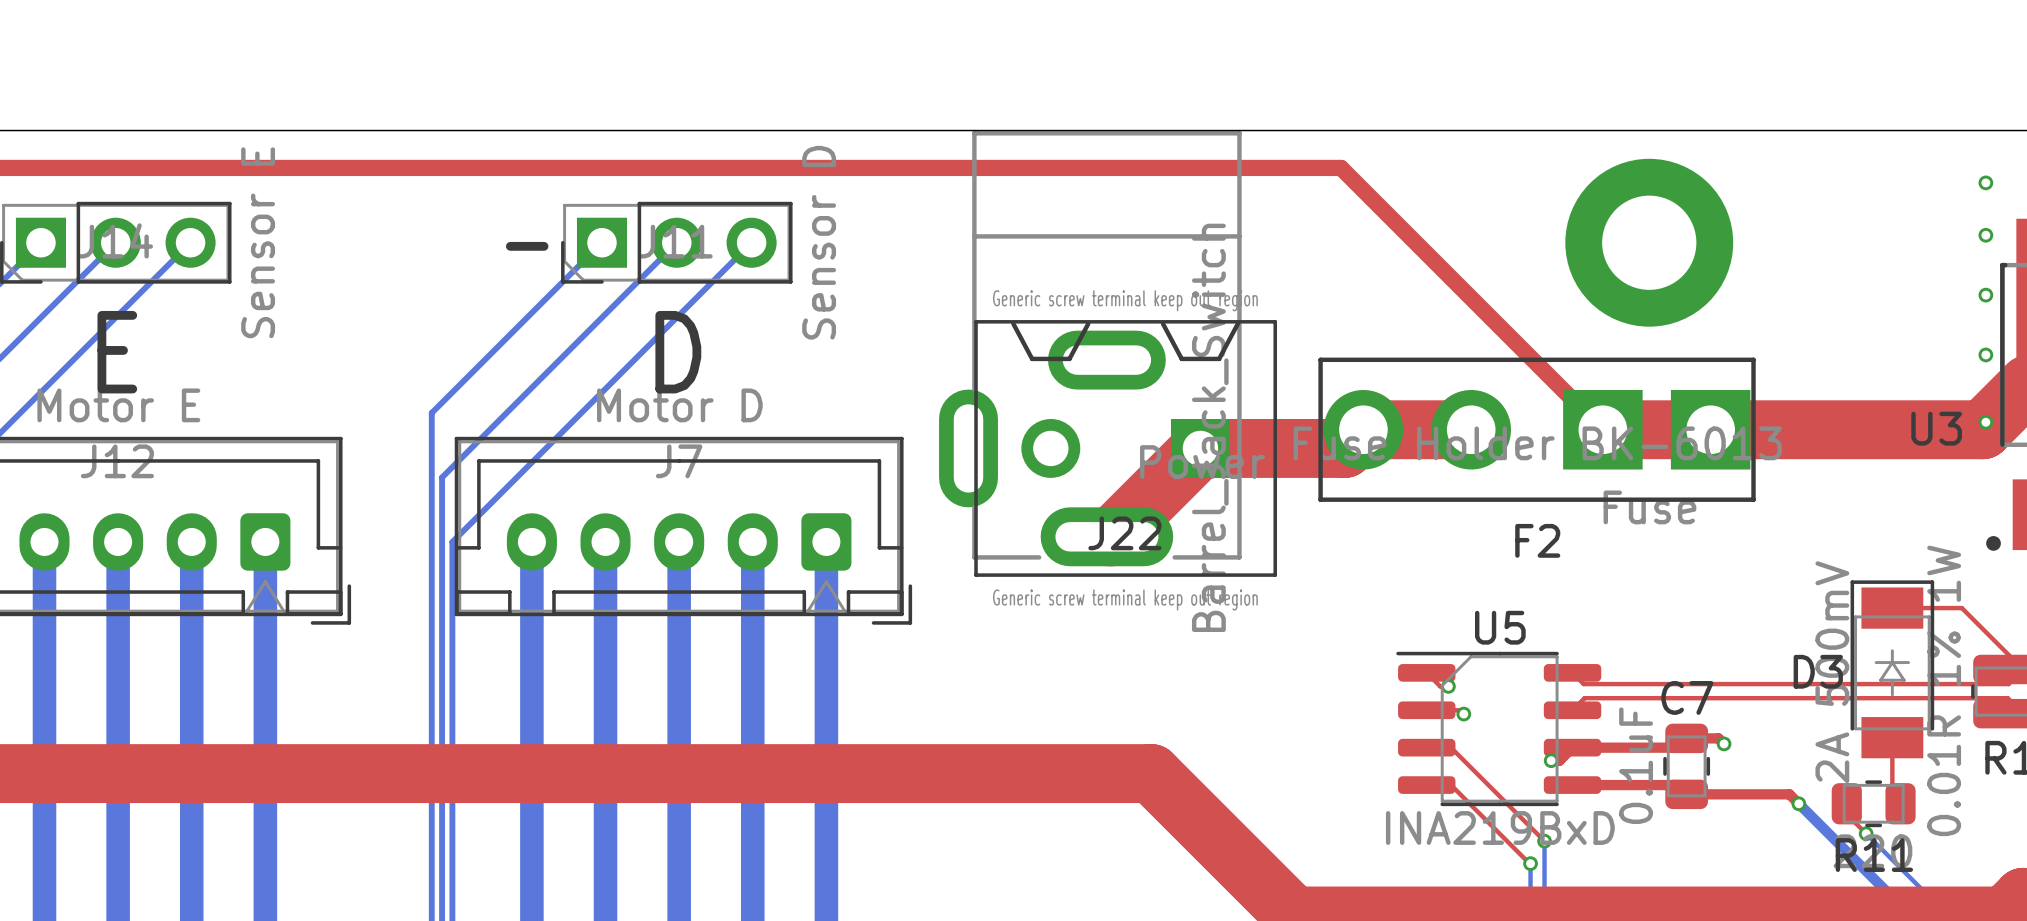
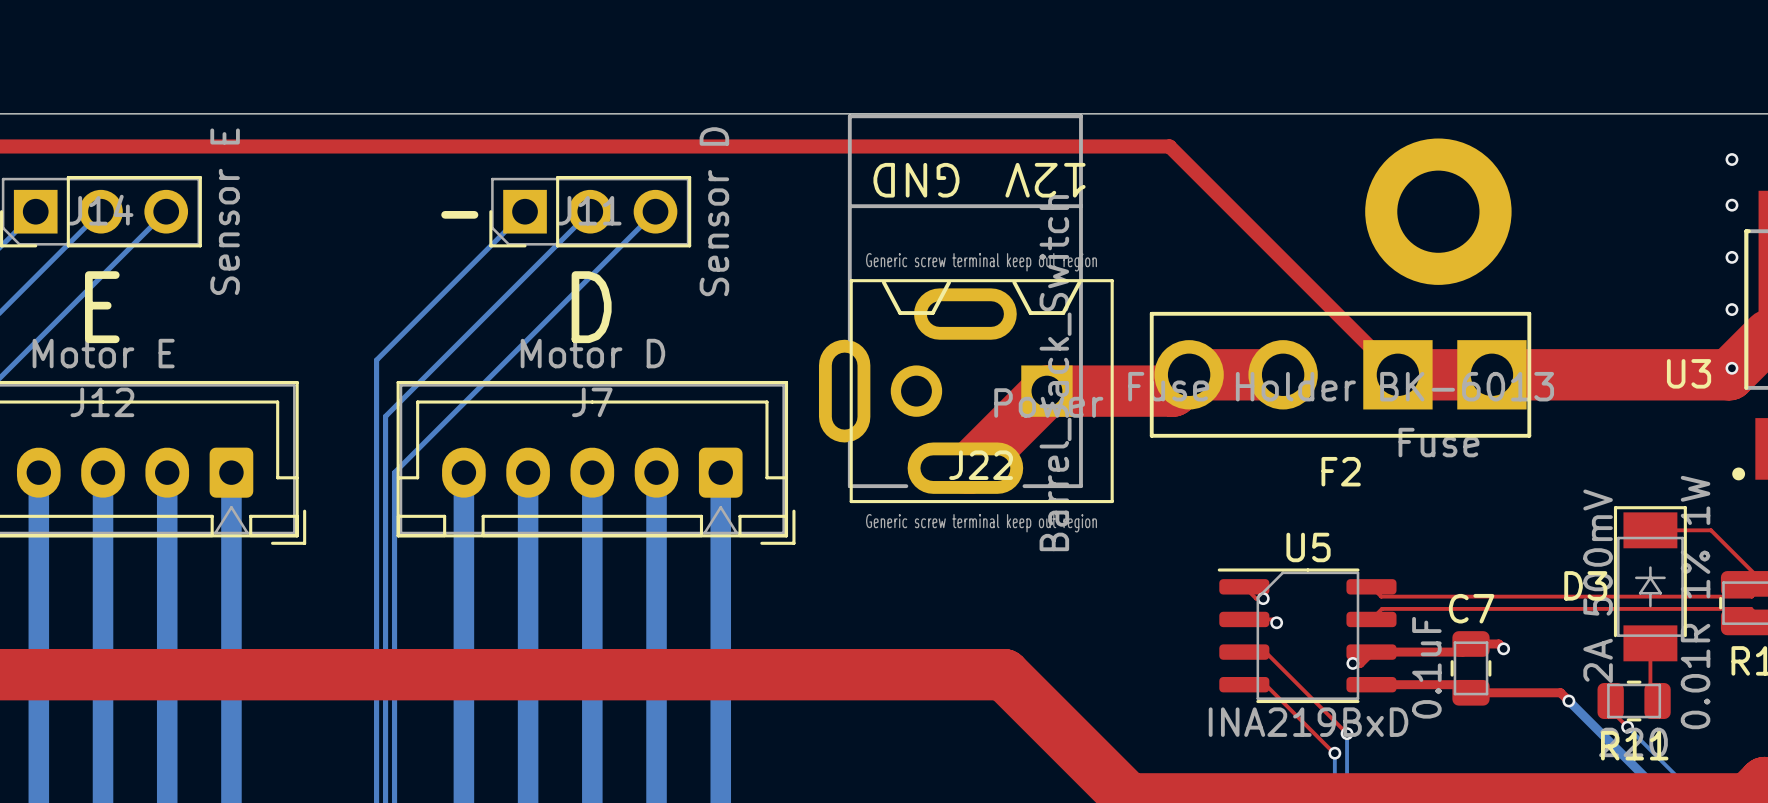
text: none -> GND (916, 180)
text: none -> 12V (1045, 180)

